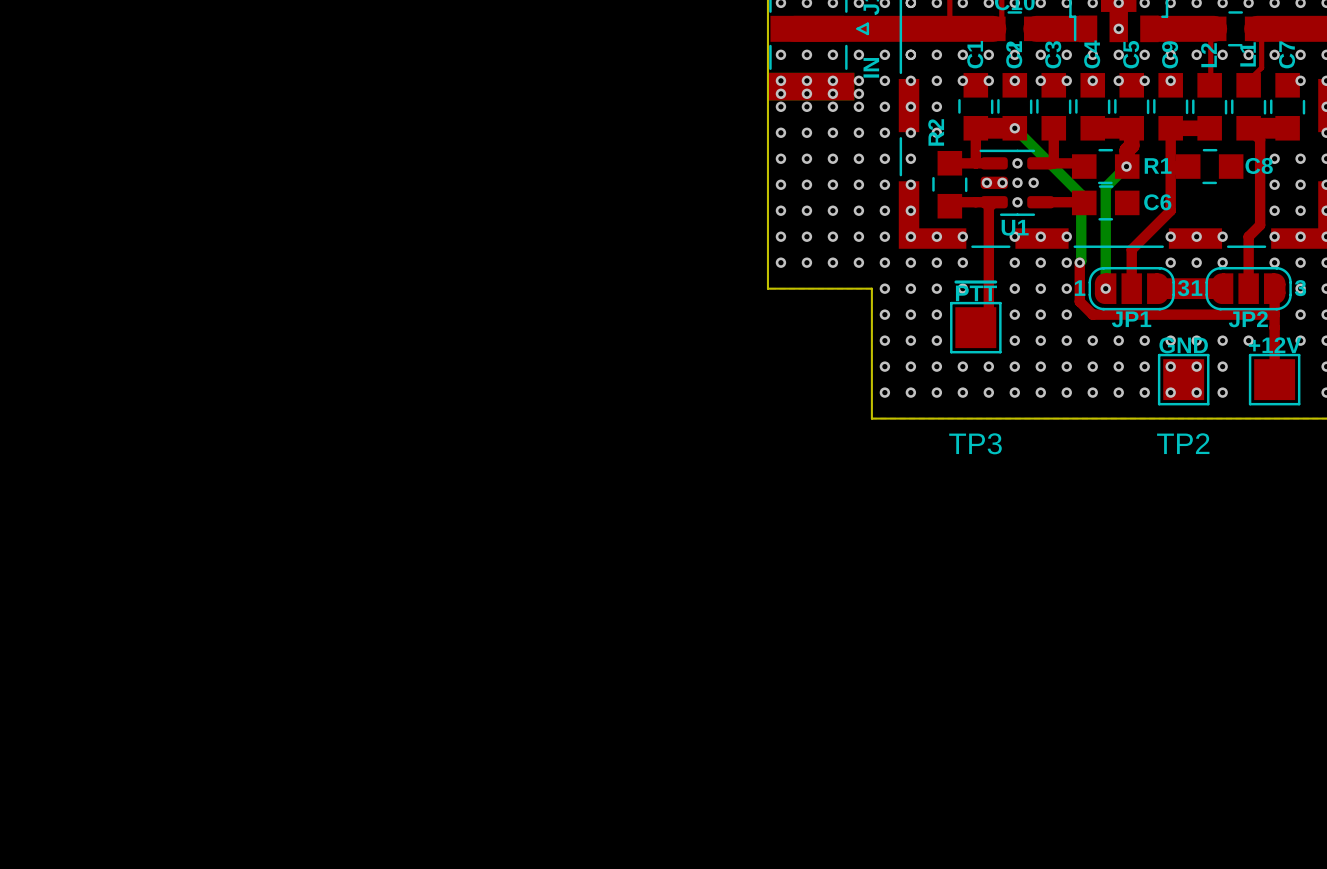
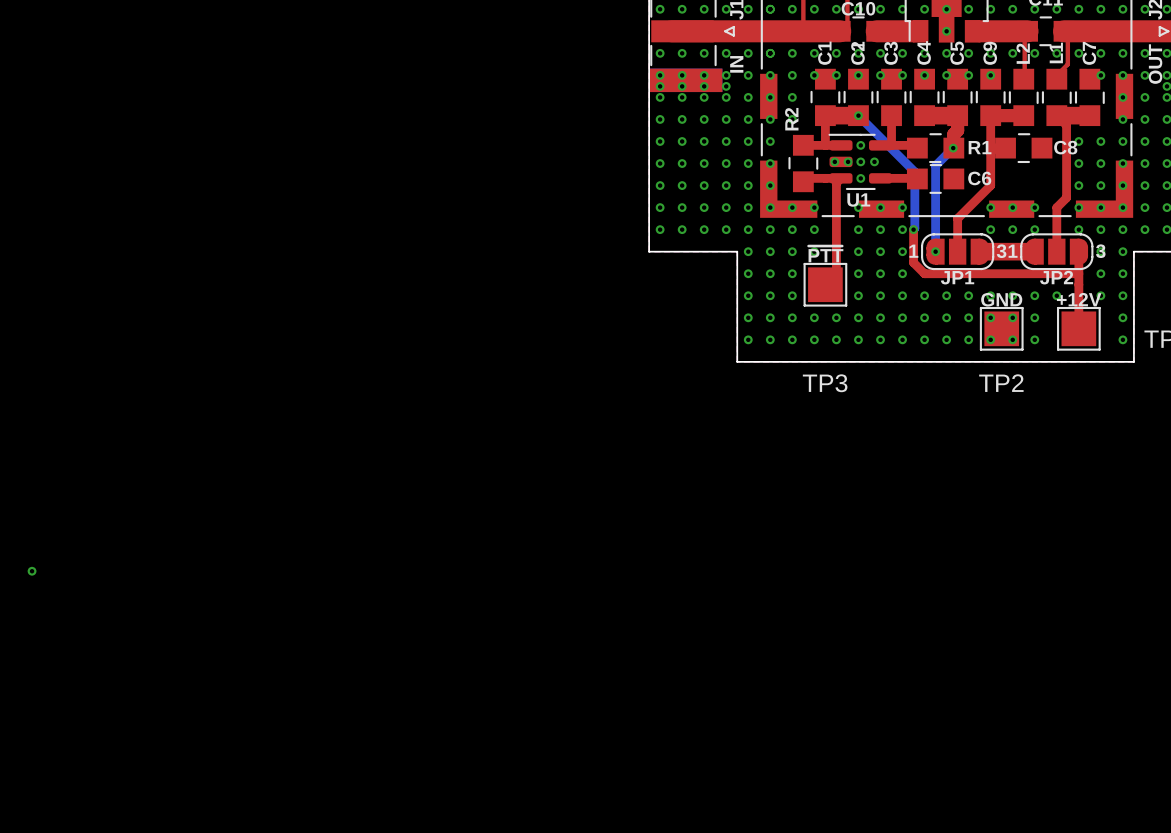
via: none -> (32, 571)

